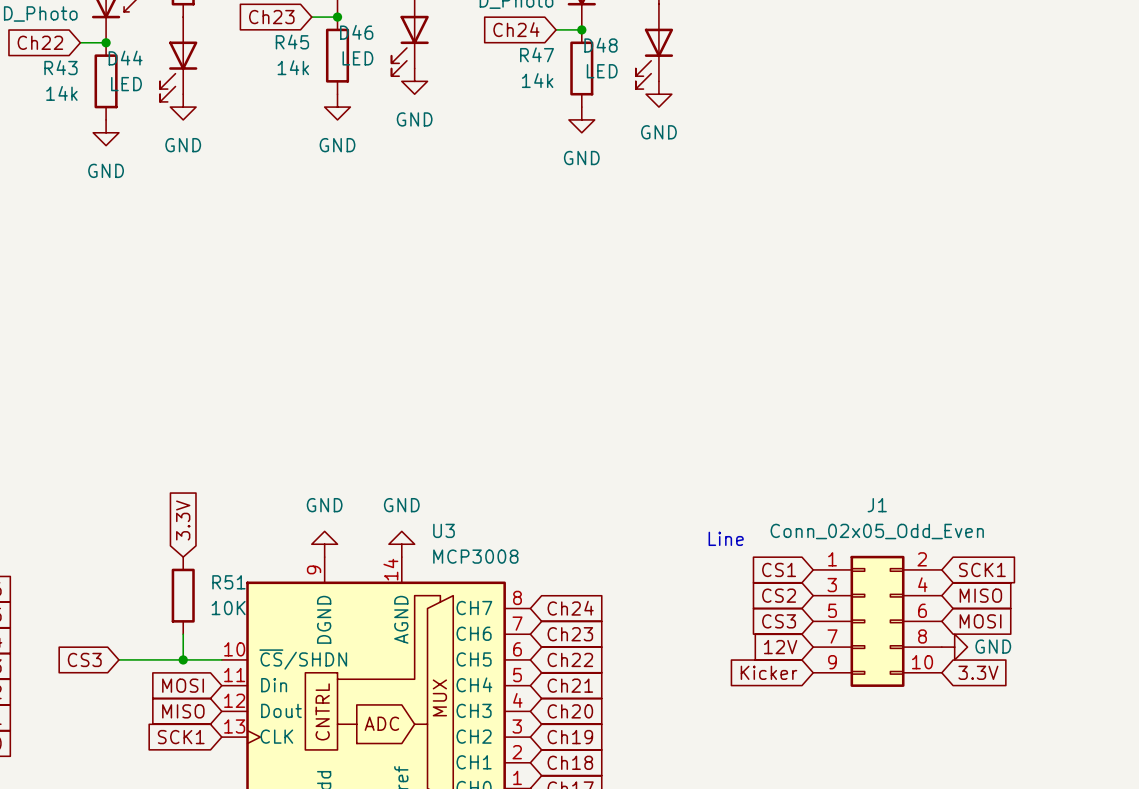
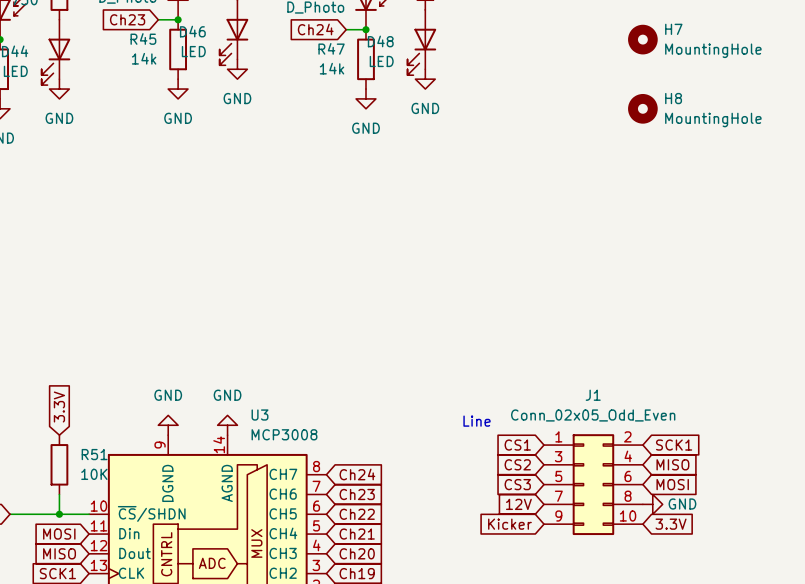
H7: none -> MountingHole (642, 39)
H8: none -> MountingHole (642, 108)

